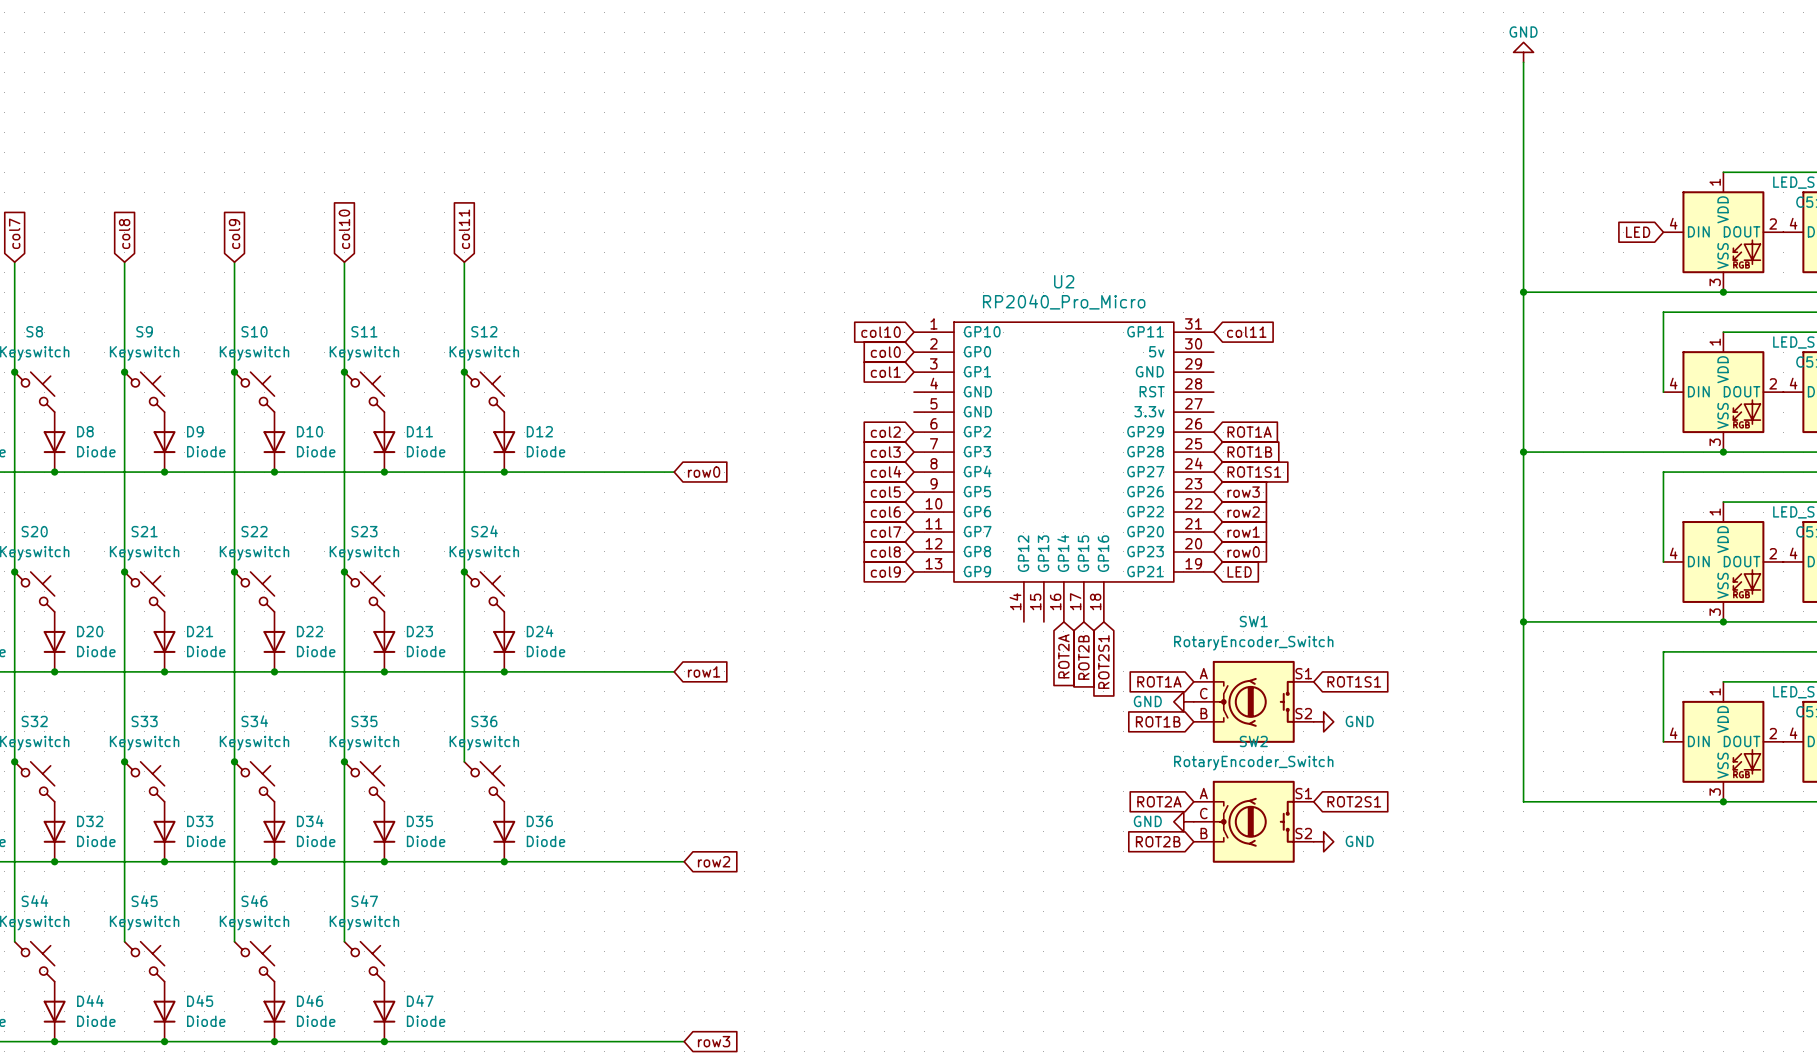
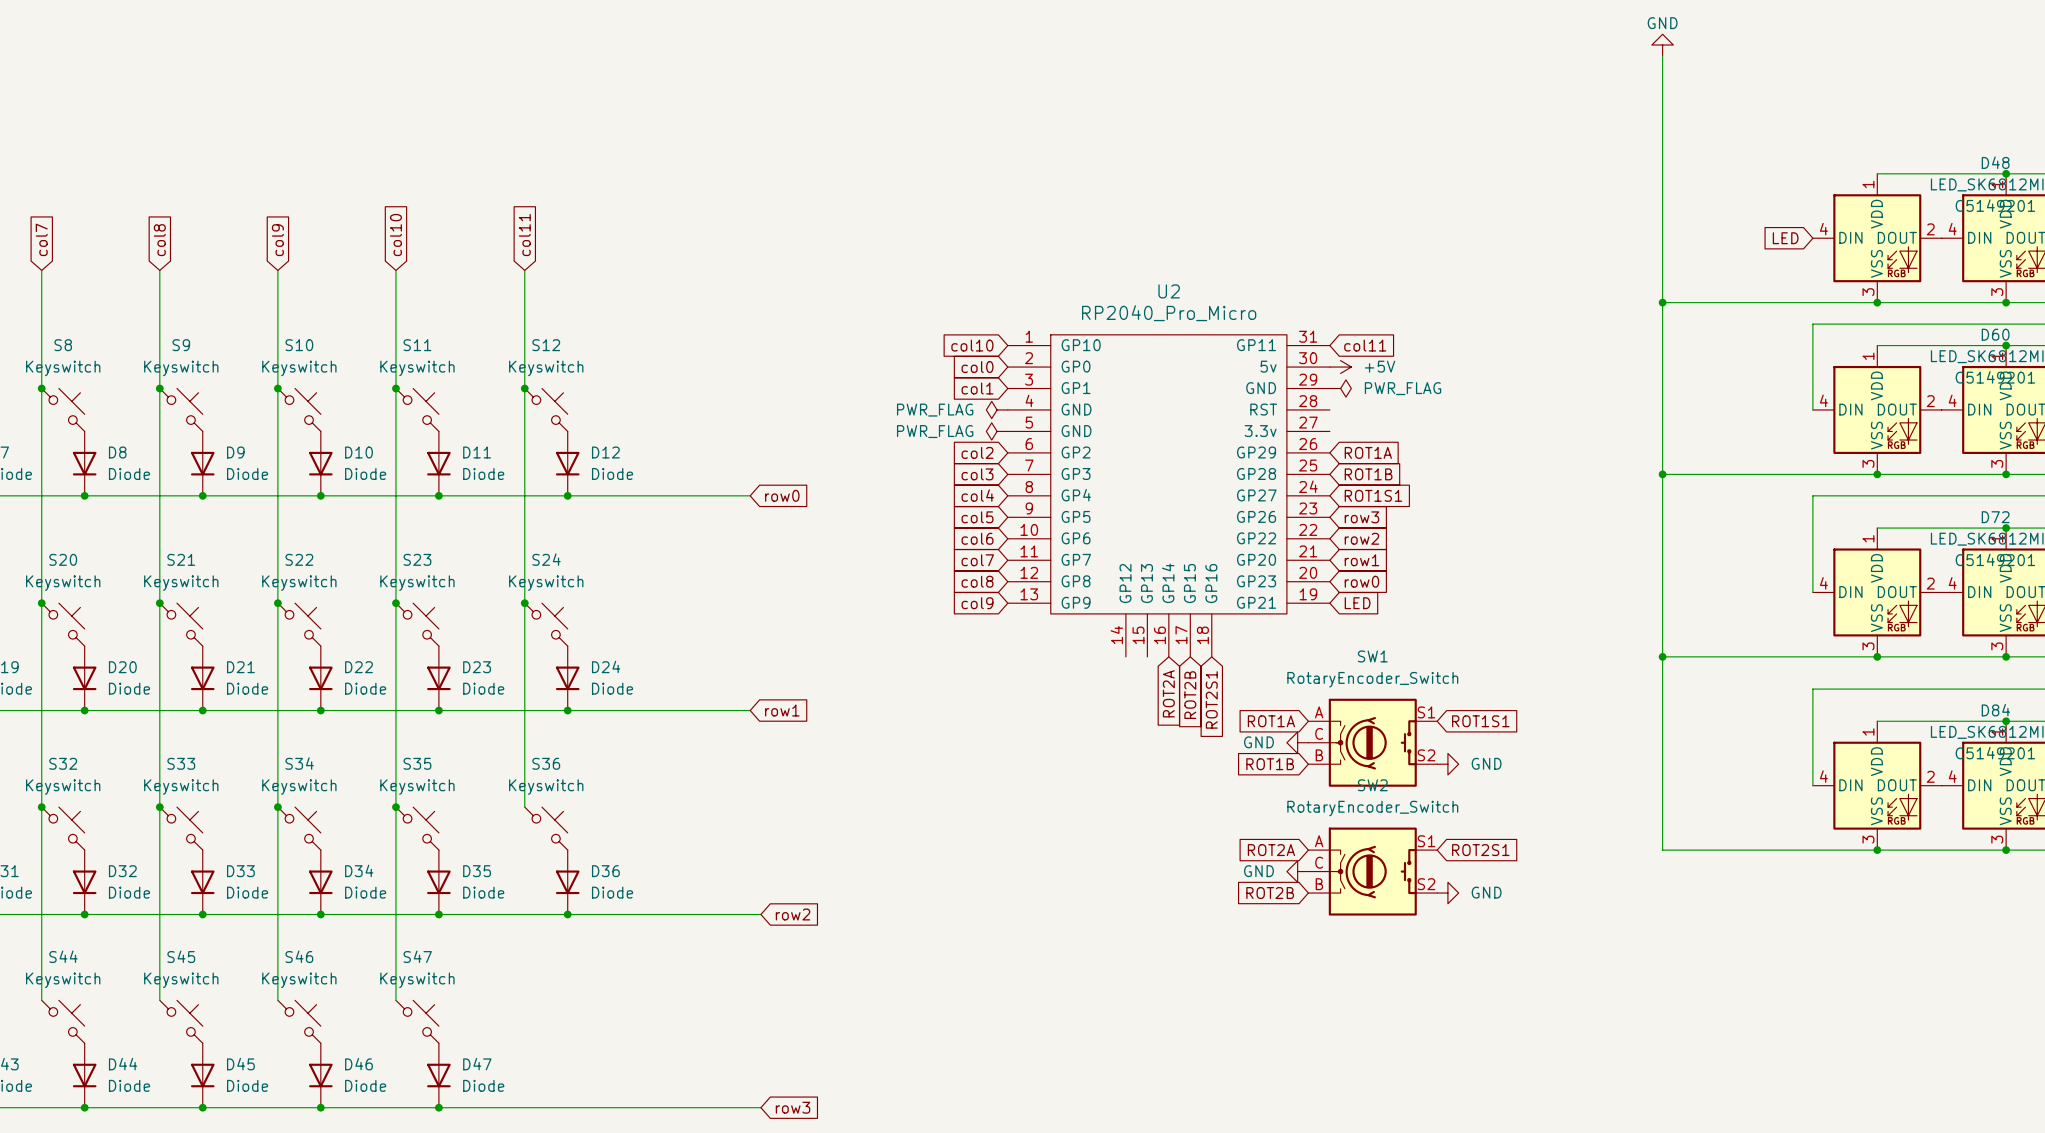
power symbol: none -> +5V (1340, 367)
power symbol: none -> PWR_FLAG (1340, 388)
power symbol: none -> PWR_FLAG (997, 409)
power symbol: none -> PWR_FLAG (997, 431)

